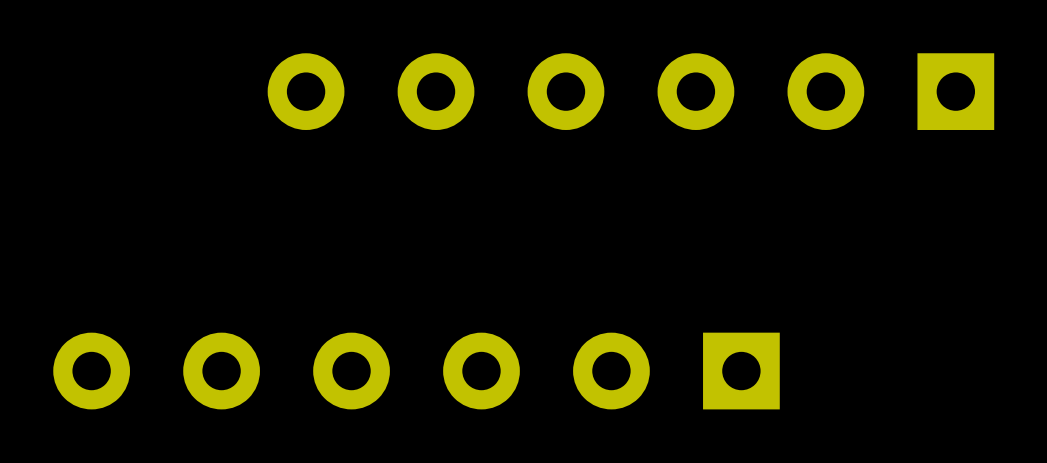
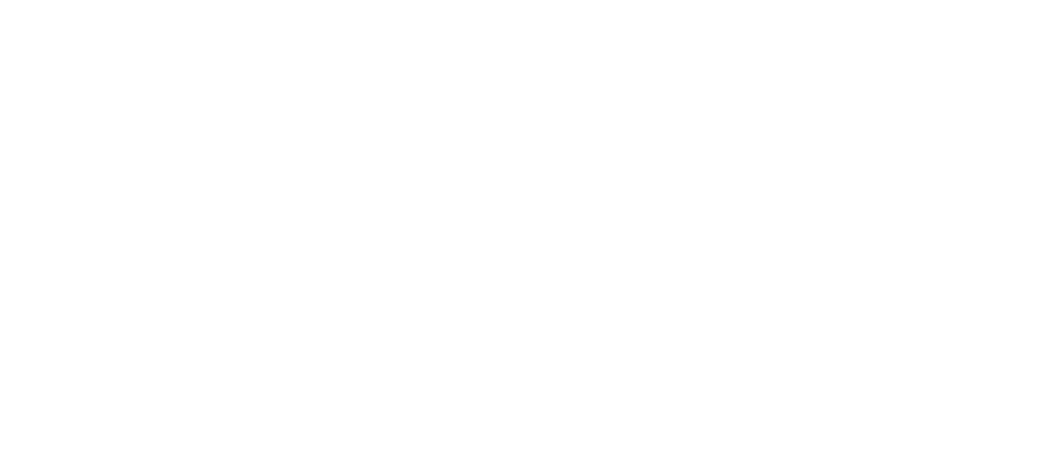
part: (630, 91) -> none
part: (416, 371) -> none

